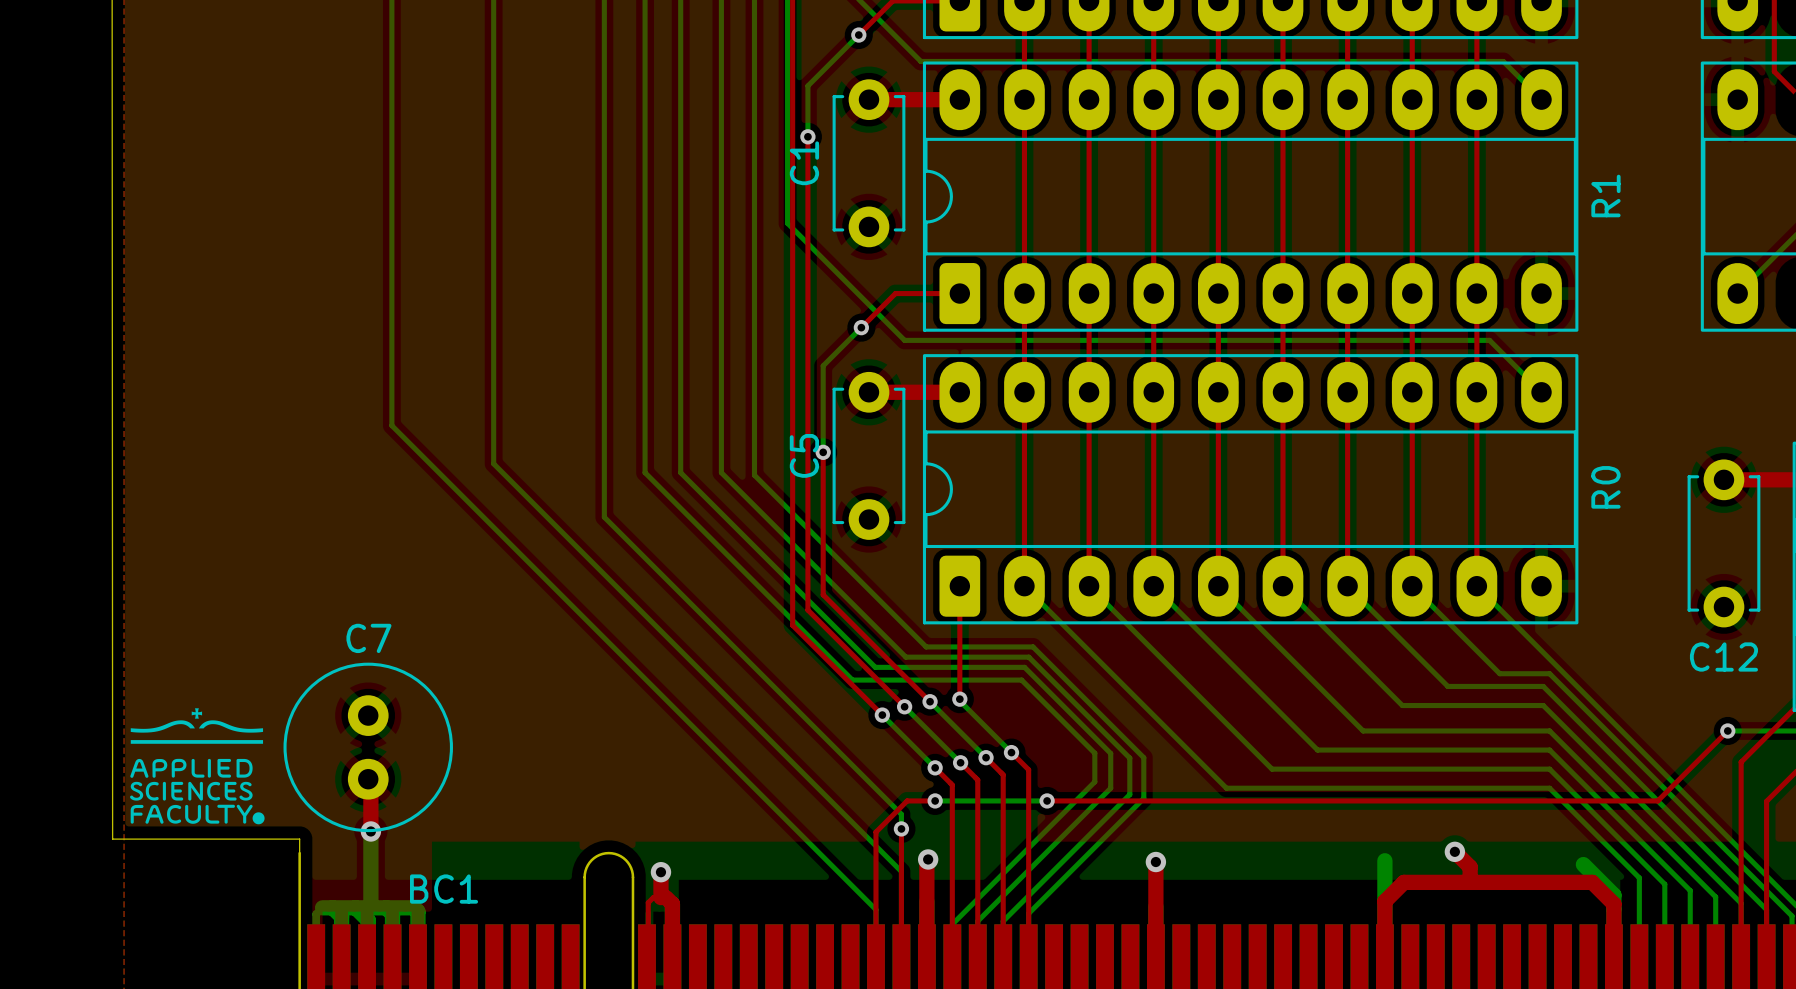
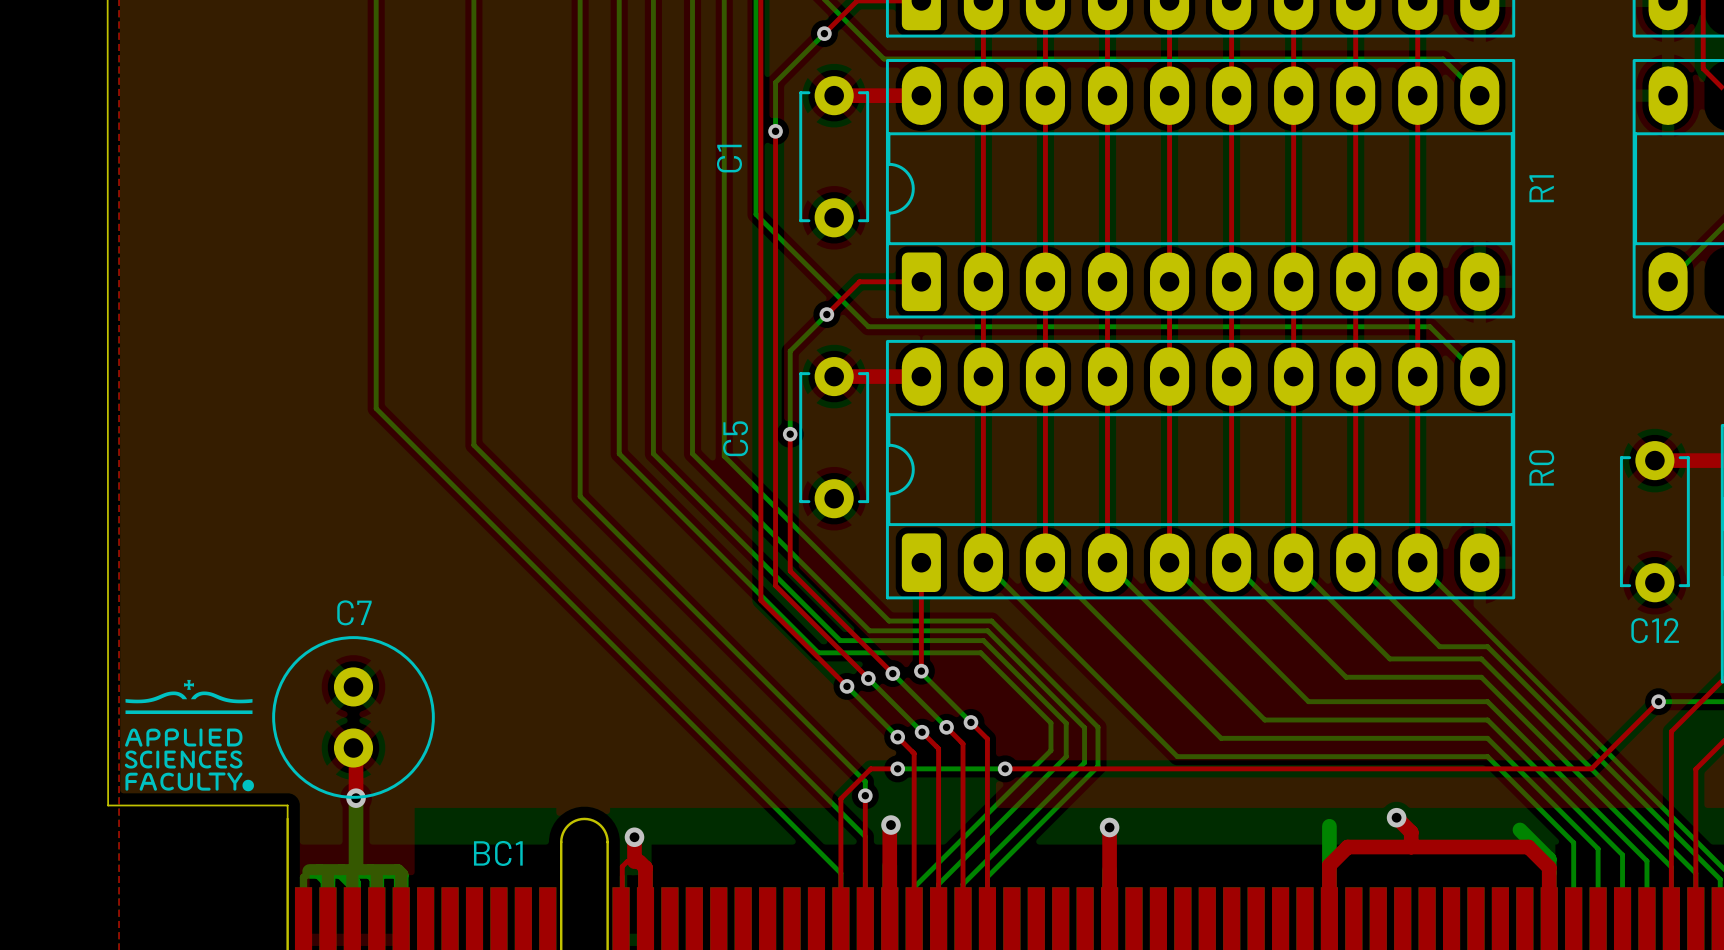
C1 name position: C1 (804, 163) -> C1 (729, 158)
C5 name position: C5 (804, 455) -> C5 (735, 438)
BC1 name position: BC1 (444, 889) -> BC1 (498, 853)

